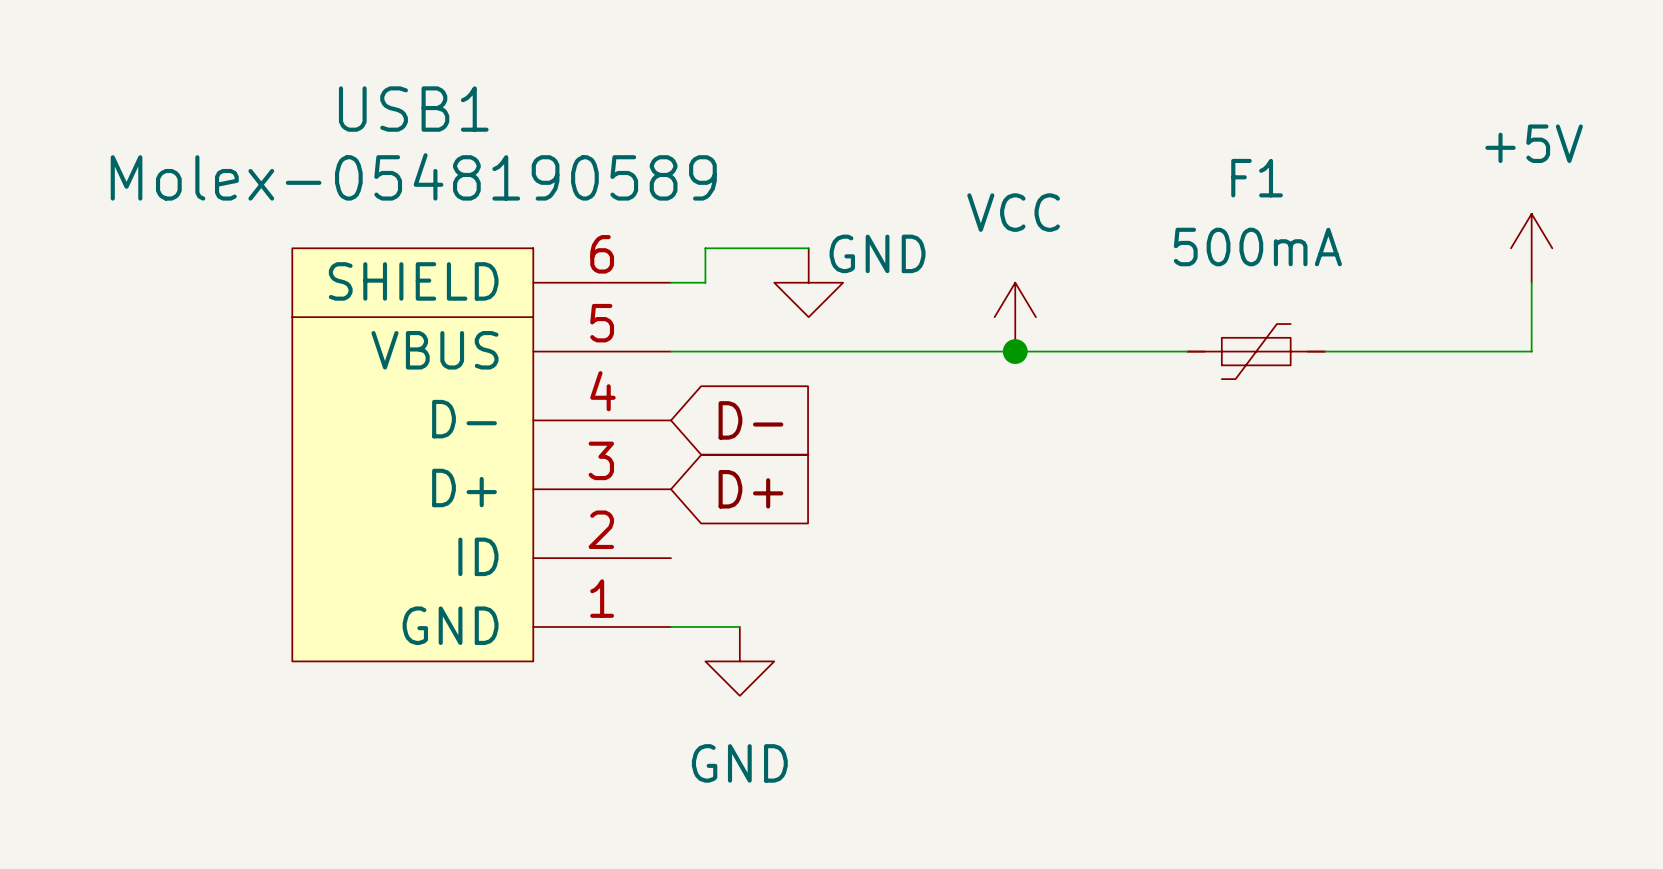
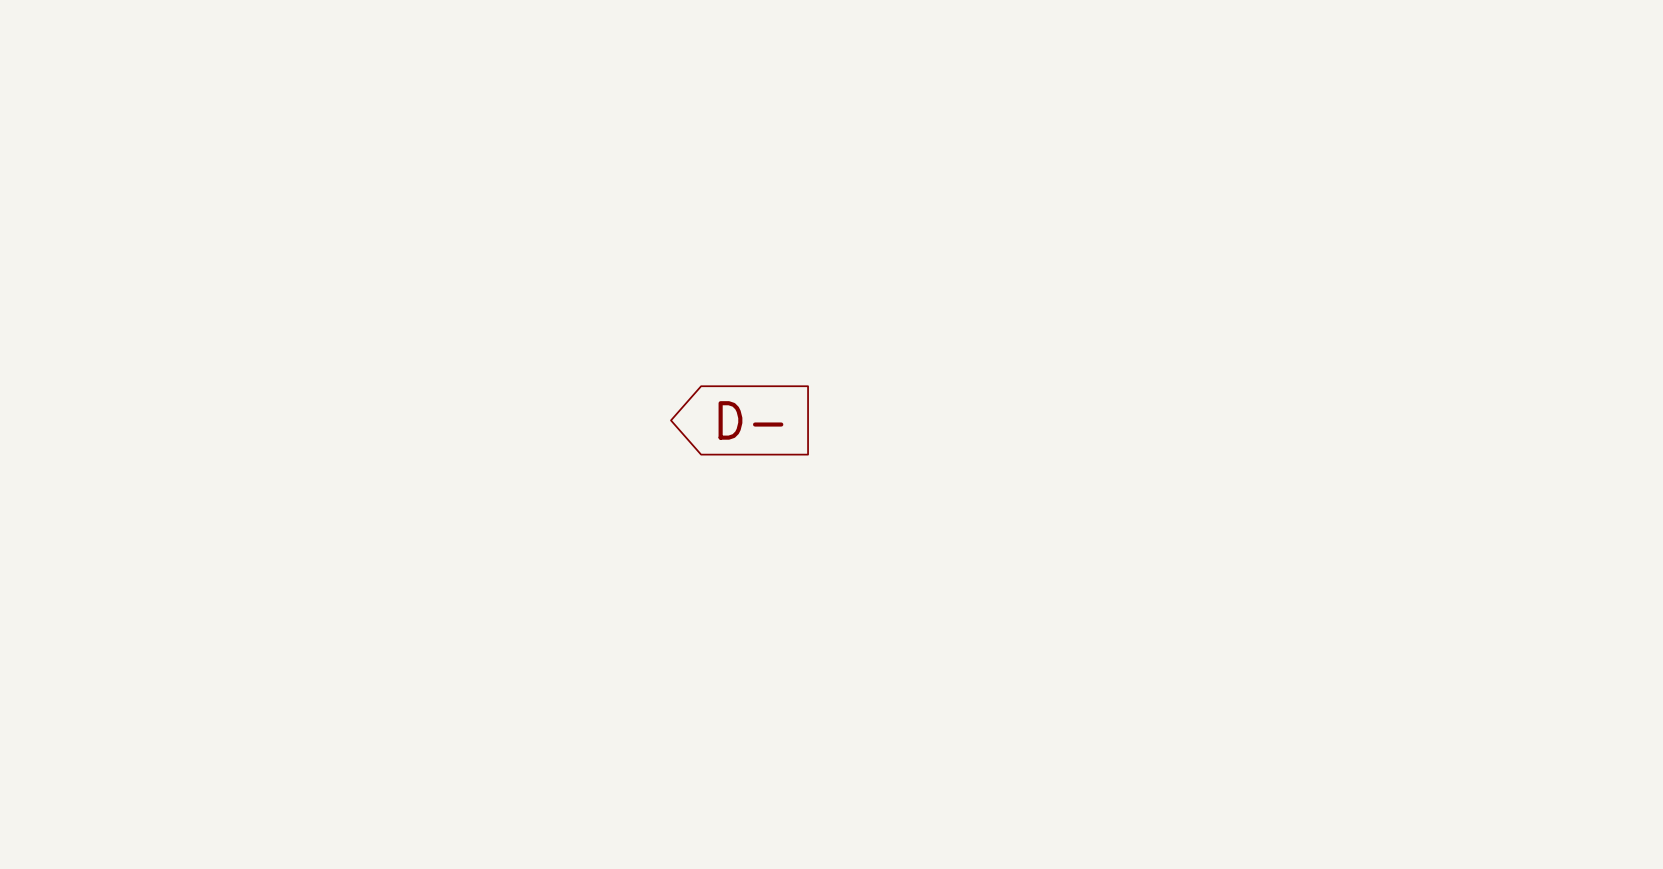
wire: (808, 248) (705, 248) (705, 282) (670, 282) -> none
power symbol: +5V (1531, 248) -> none
power symbol: GND (808, 282) -> none
wire: (1531, 282) (1531, 351) (1325, 351) -> none
power symbol: VCC (1015, 317) -> none
wire: (670, 351) (1187, 351) -> none
junction: (1015, 351) -> none
F1: 500mA (1256, 351) -> none
USB1: Molex-0548190589 (481, 454) -> none
global label: D+ (750, 489) -> none
wire: (670, 626) (739, 626) -> none
power symbol: GND (739, 661) -> none

